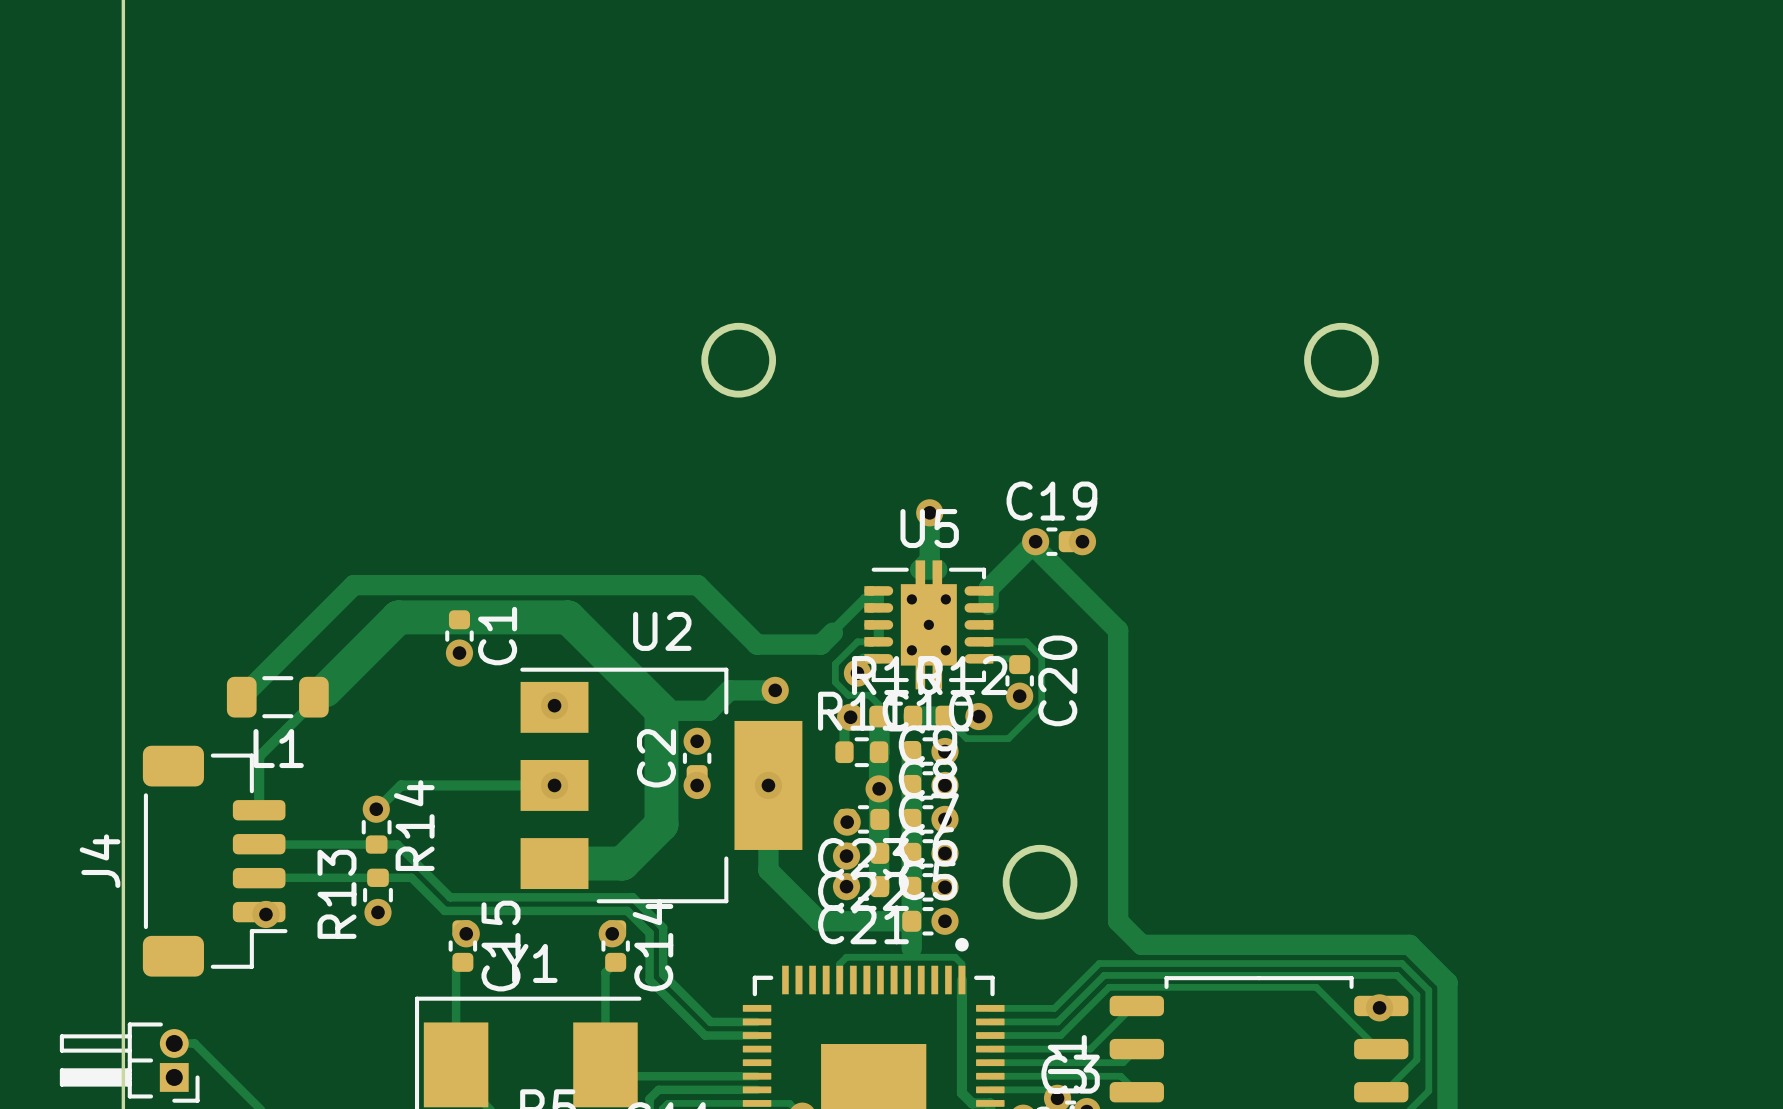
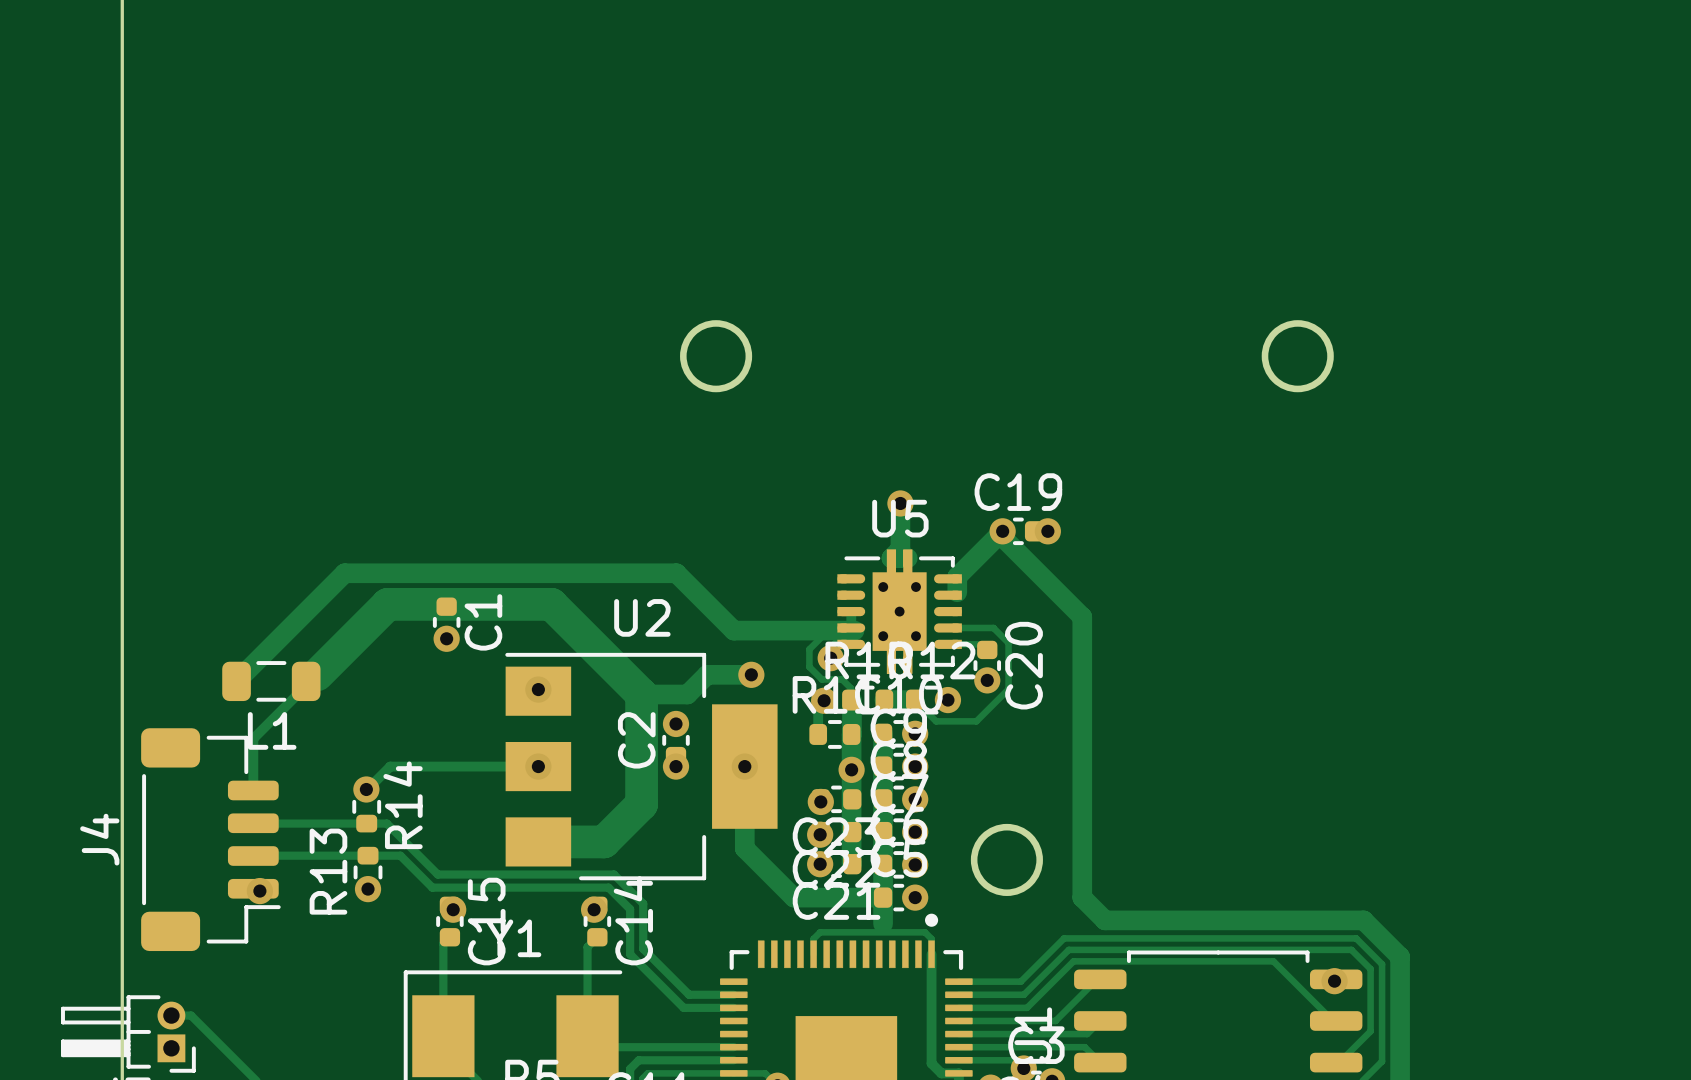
track: (878, 598) (865, 598) (821, 644) -> (854, 630) (795, 630)

